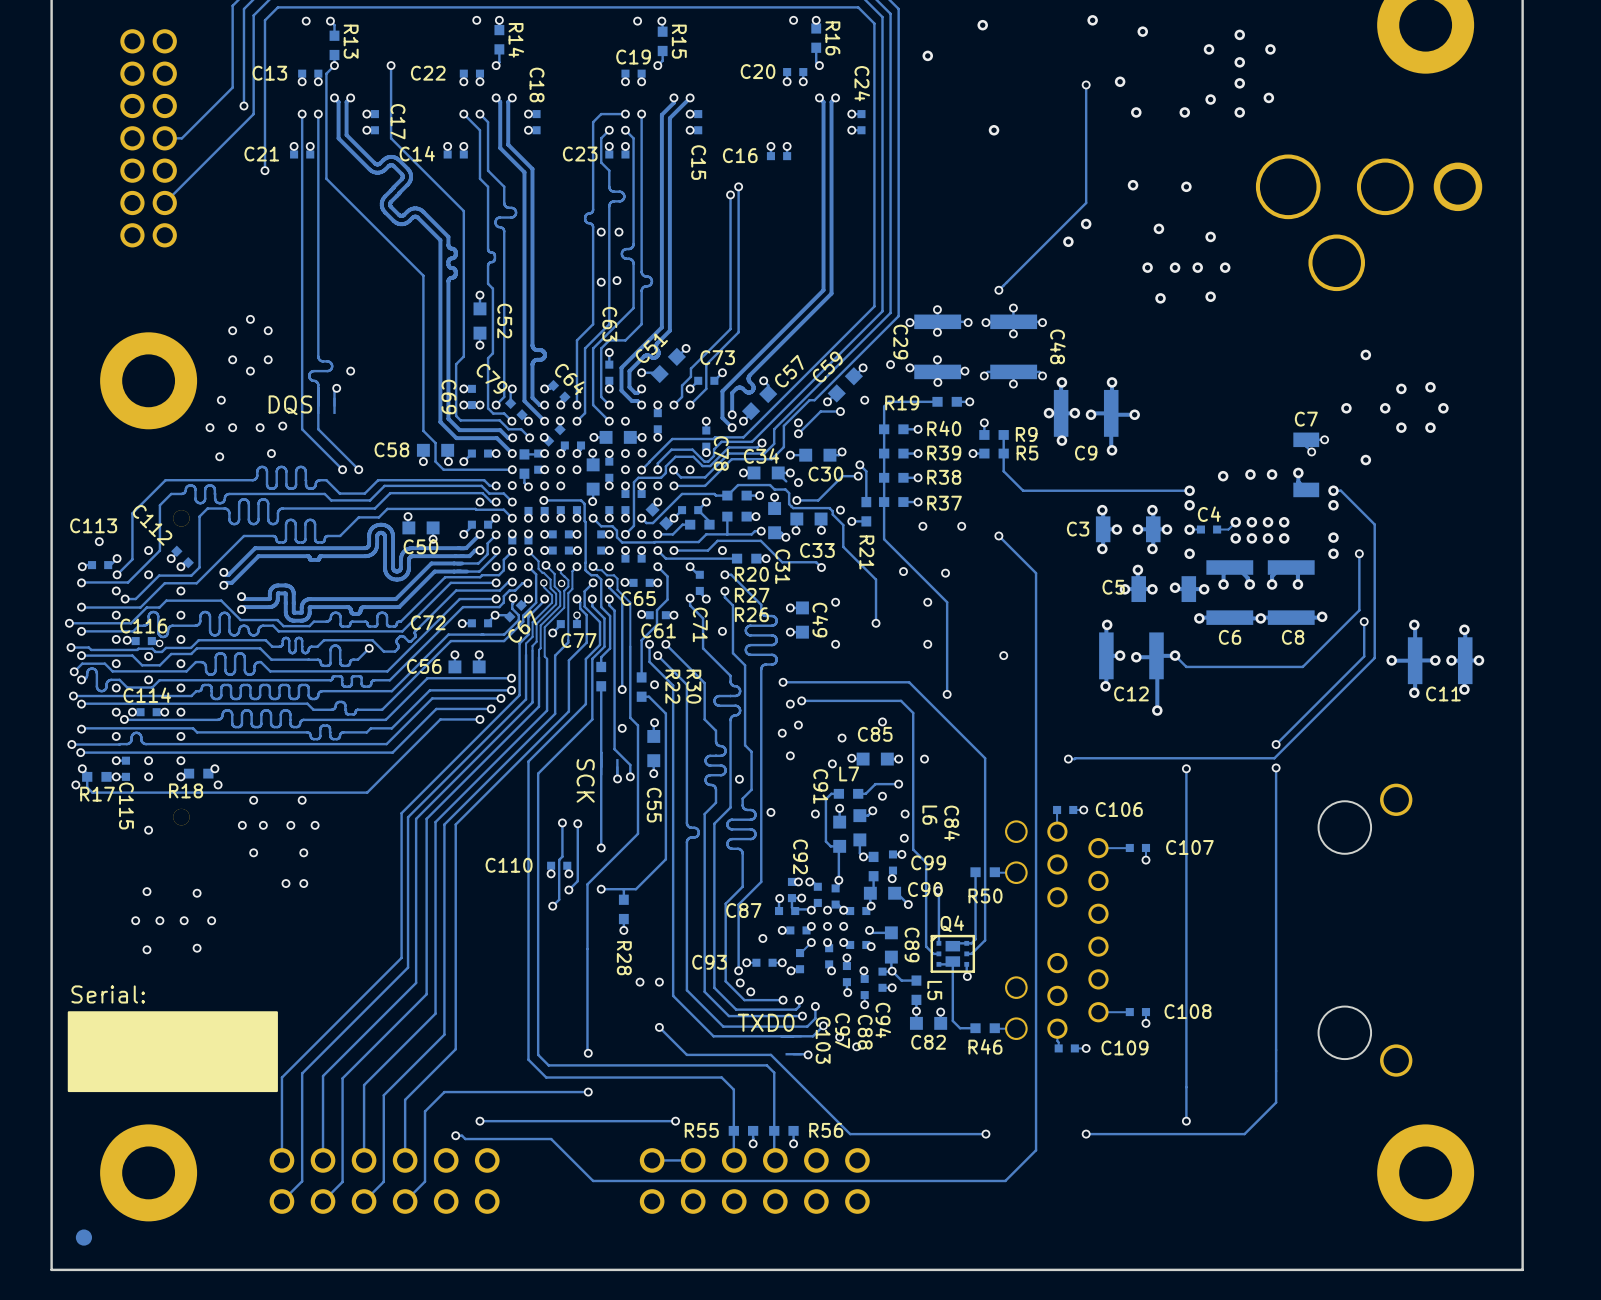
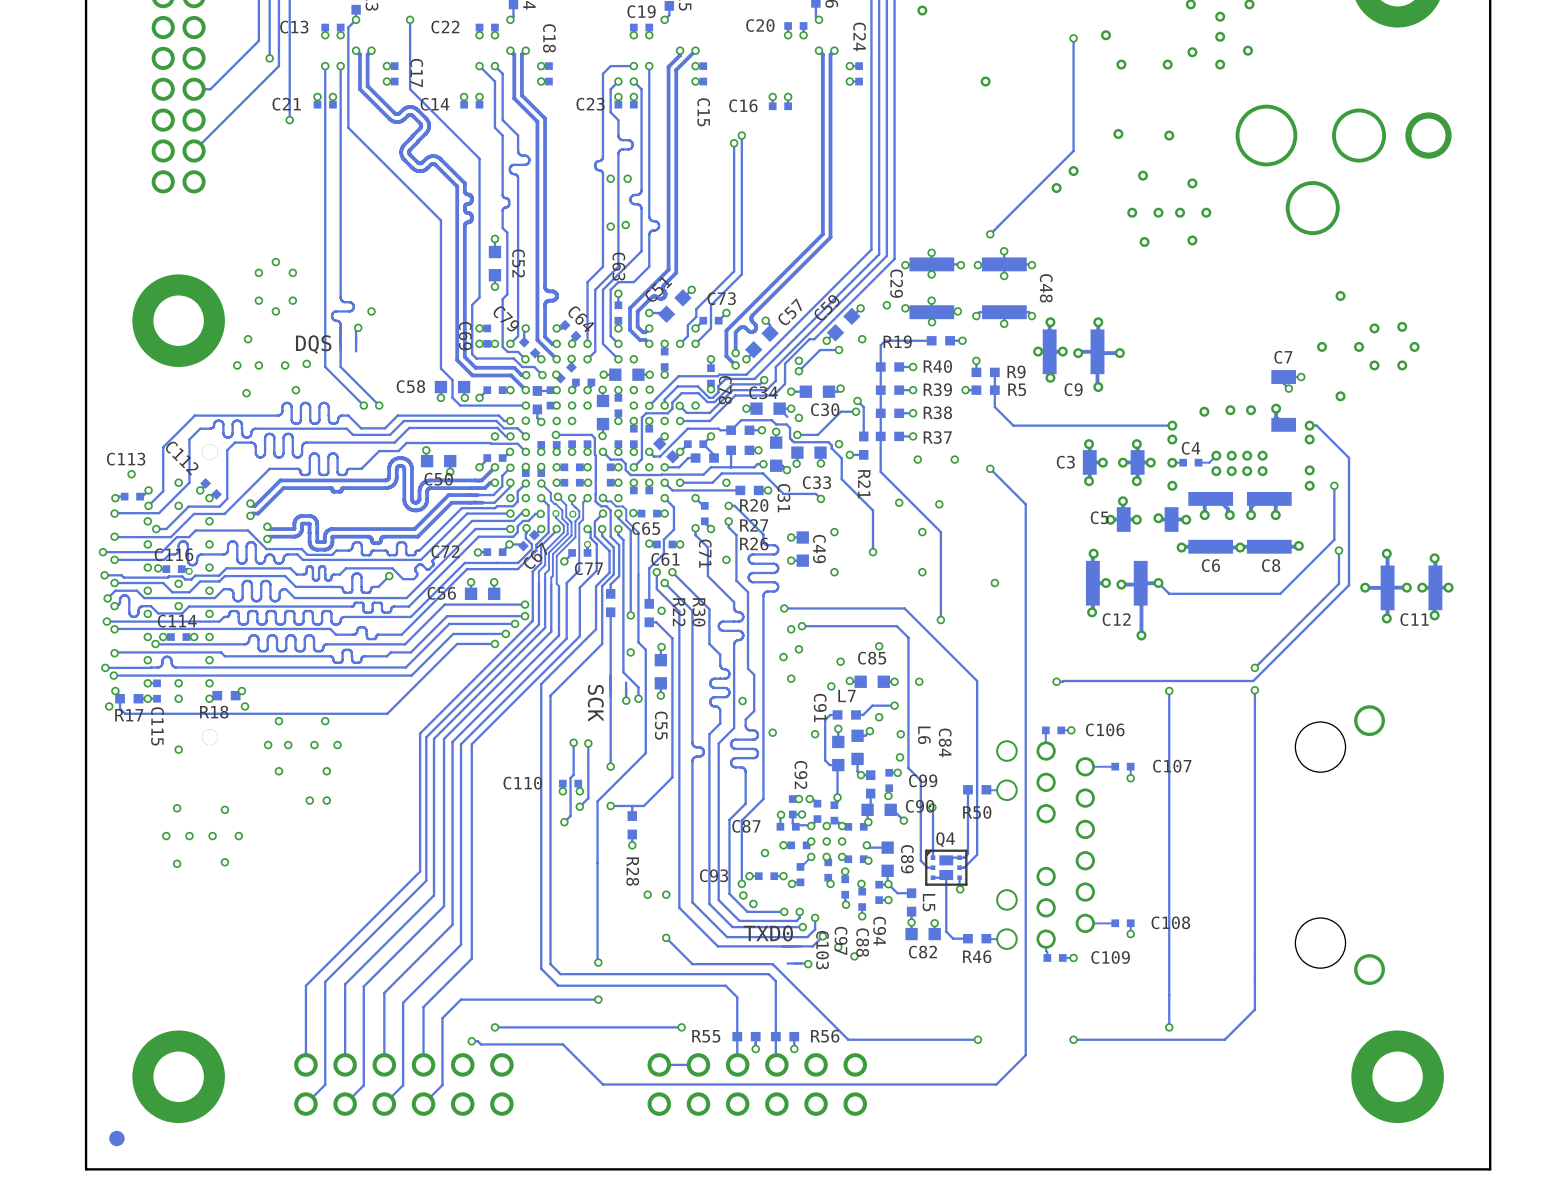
text: Serial: (108, 994) -> none
drawing: [67, 1011, 278, 1093] -> none

